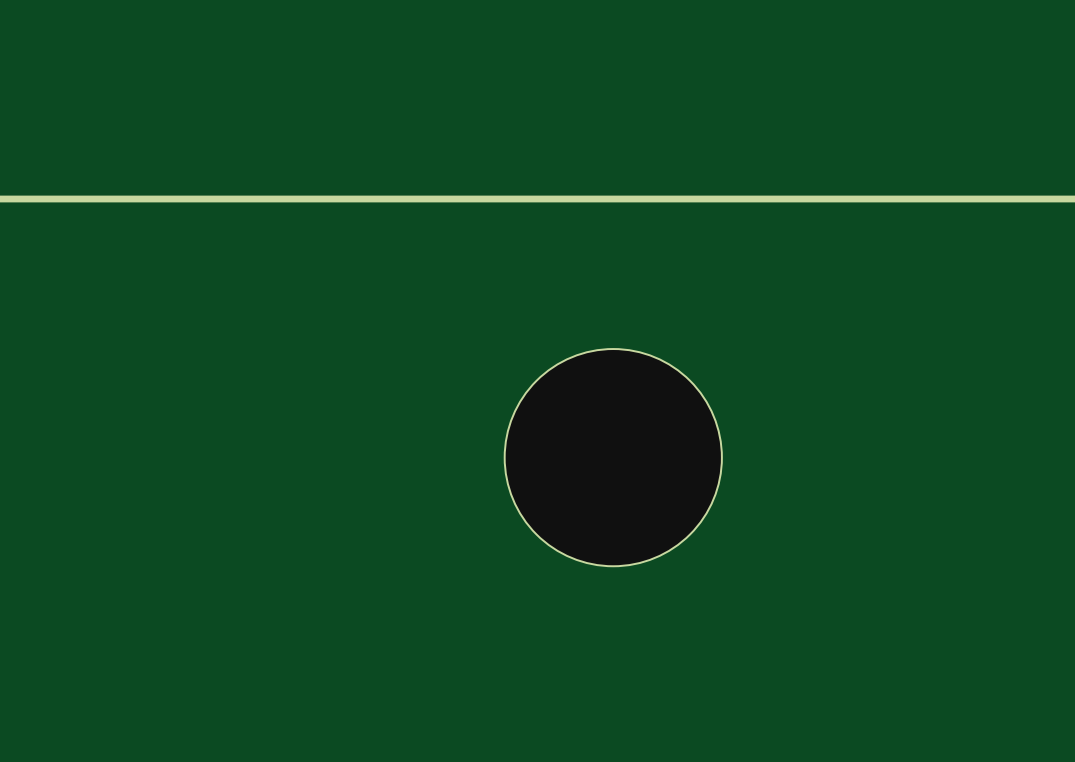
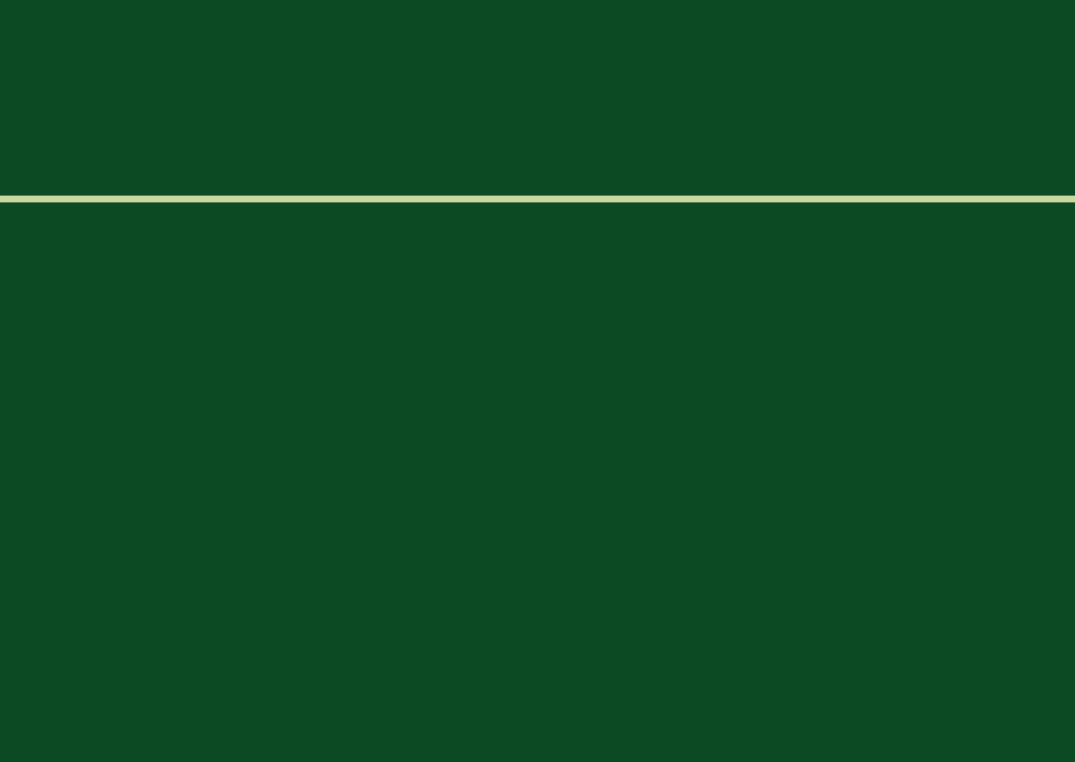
part: (613, 457) -> none

